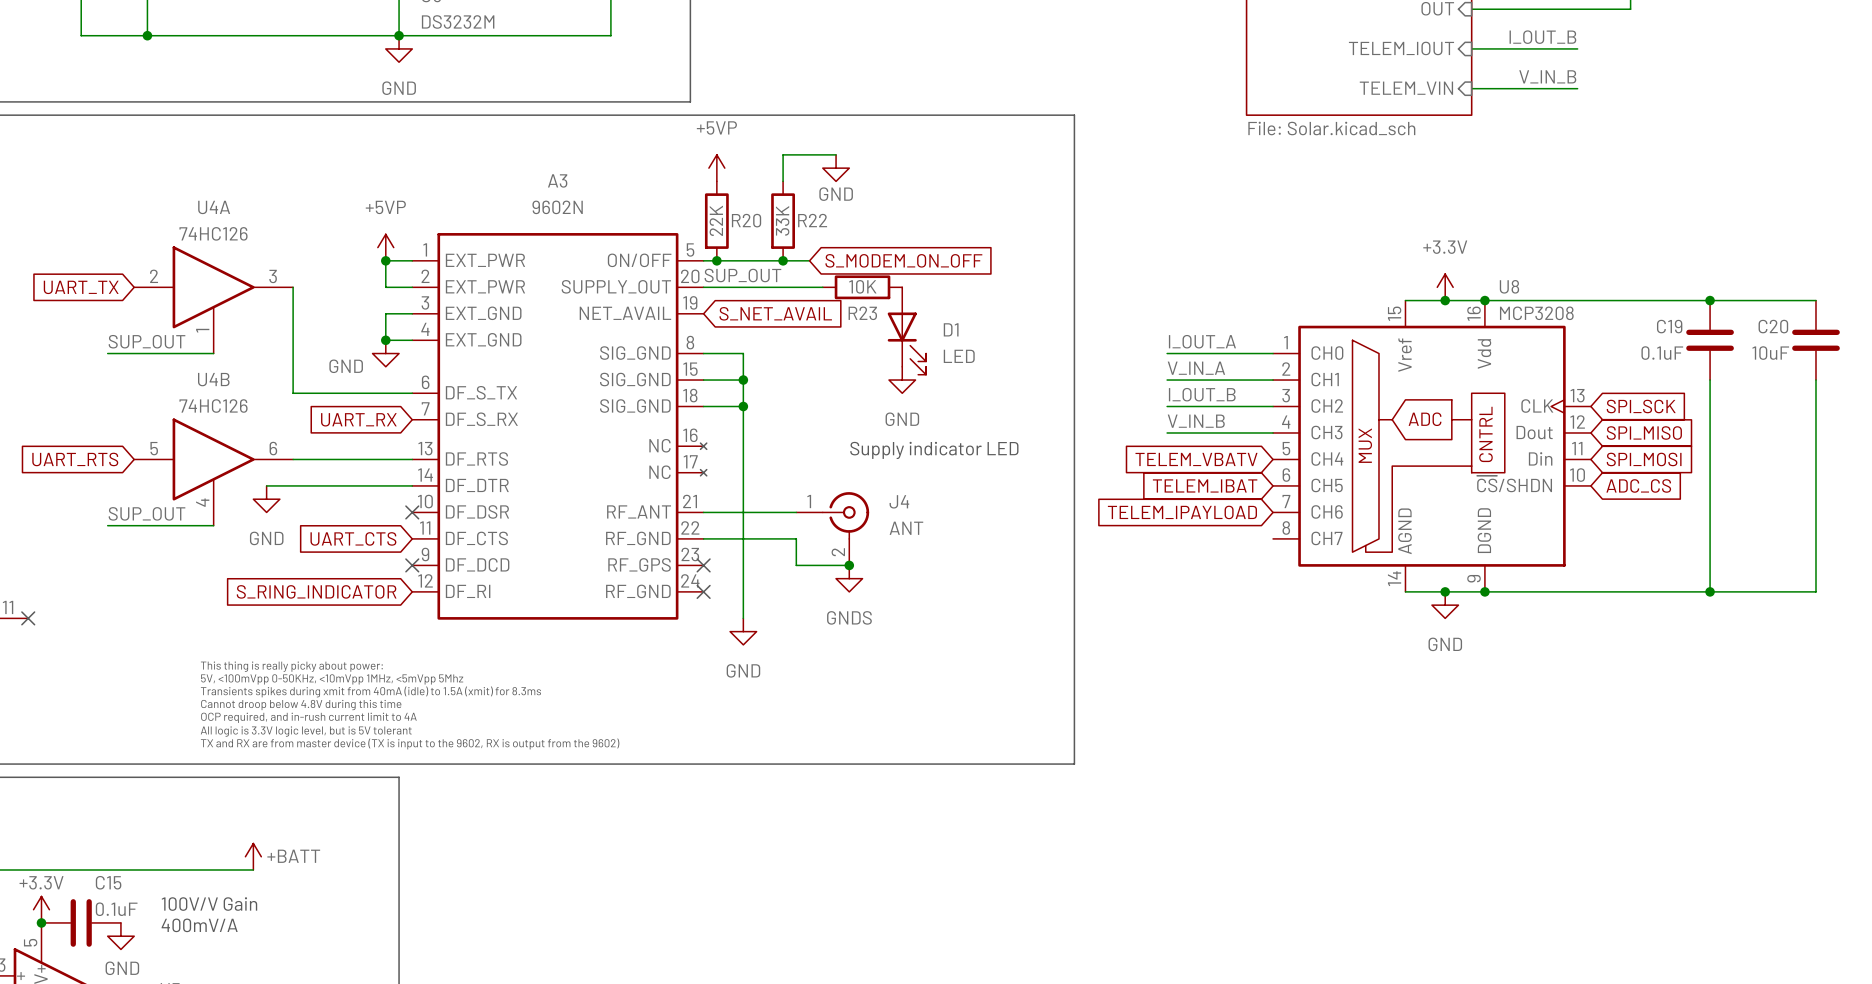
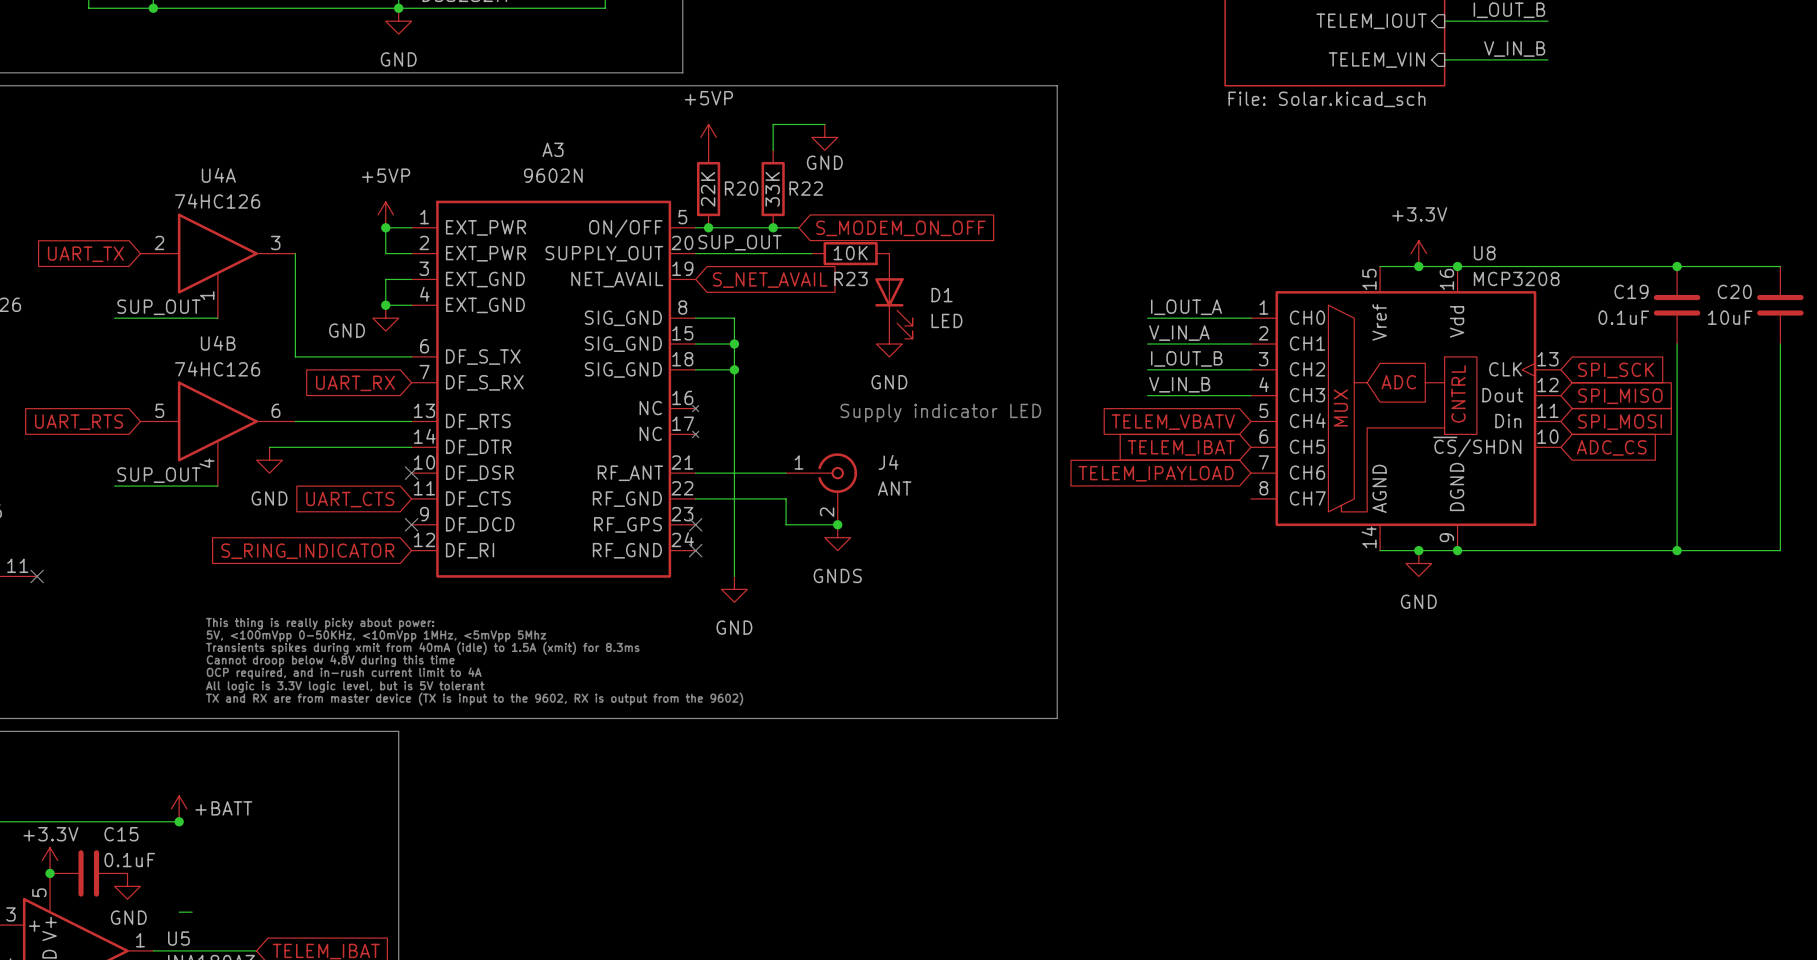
power symbol position: +BATT (253, 856) -> +BATT (179, 808)
wire: (173, 869) (253, 869) -> none
junction: none -> (179, 821)
text: 100V/V Gain (209, 904) -> none
text: 400mV/A (199, 925) -> none
wire: none -> (179, 912) (192, 912)

